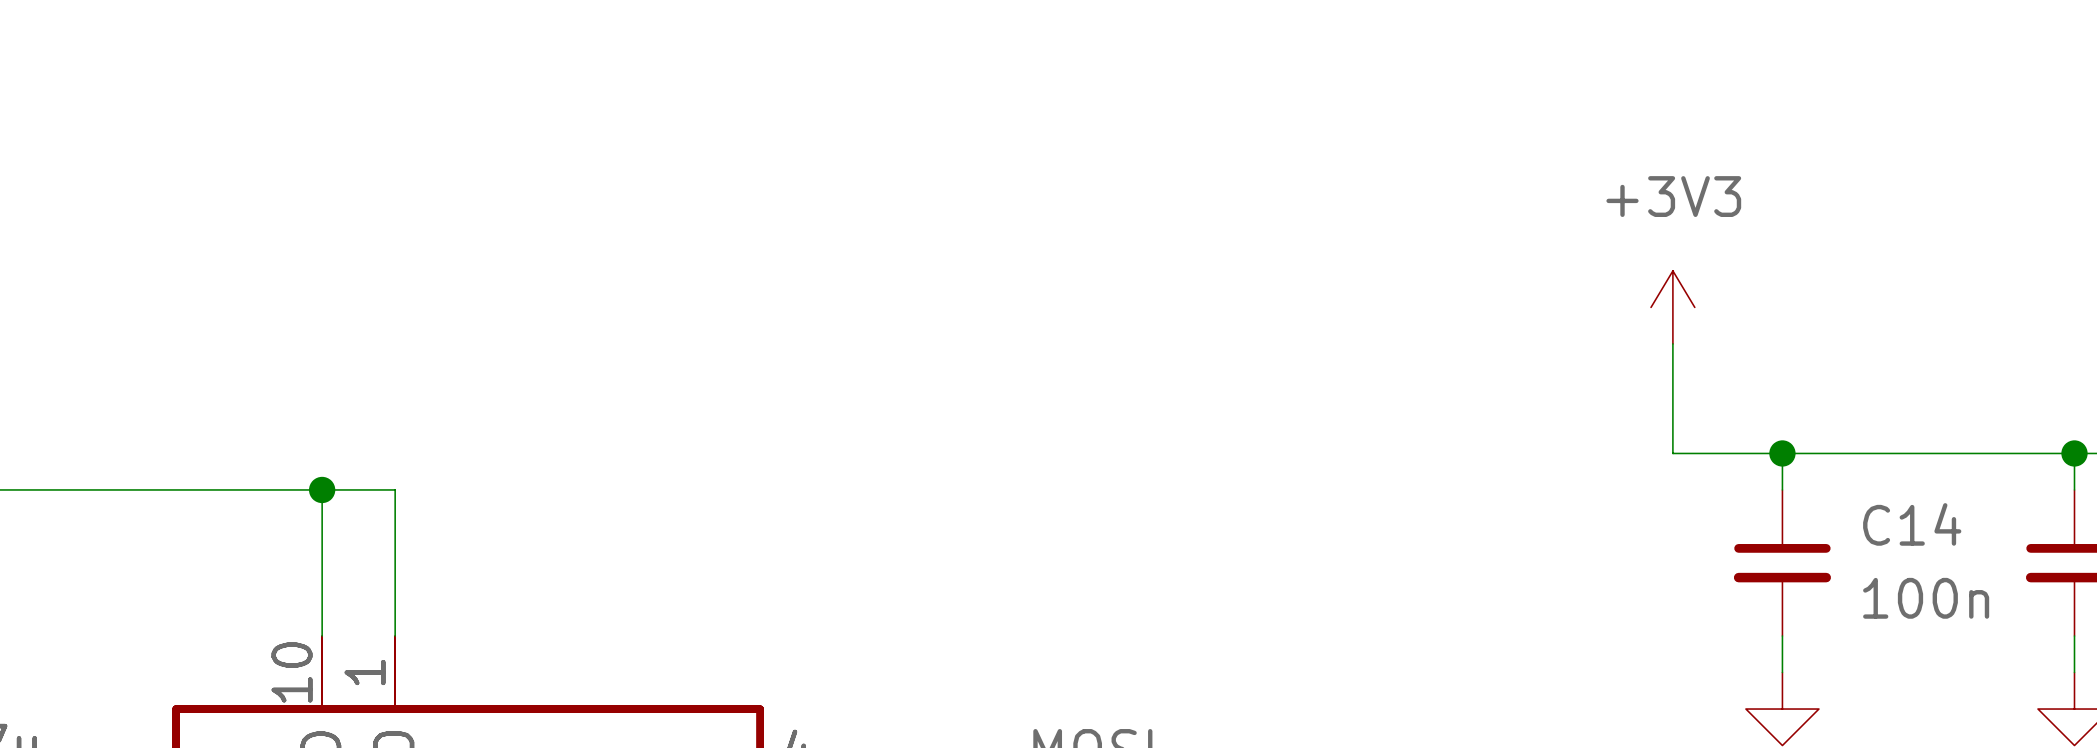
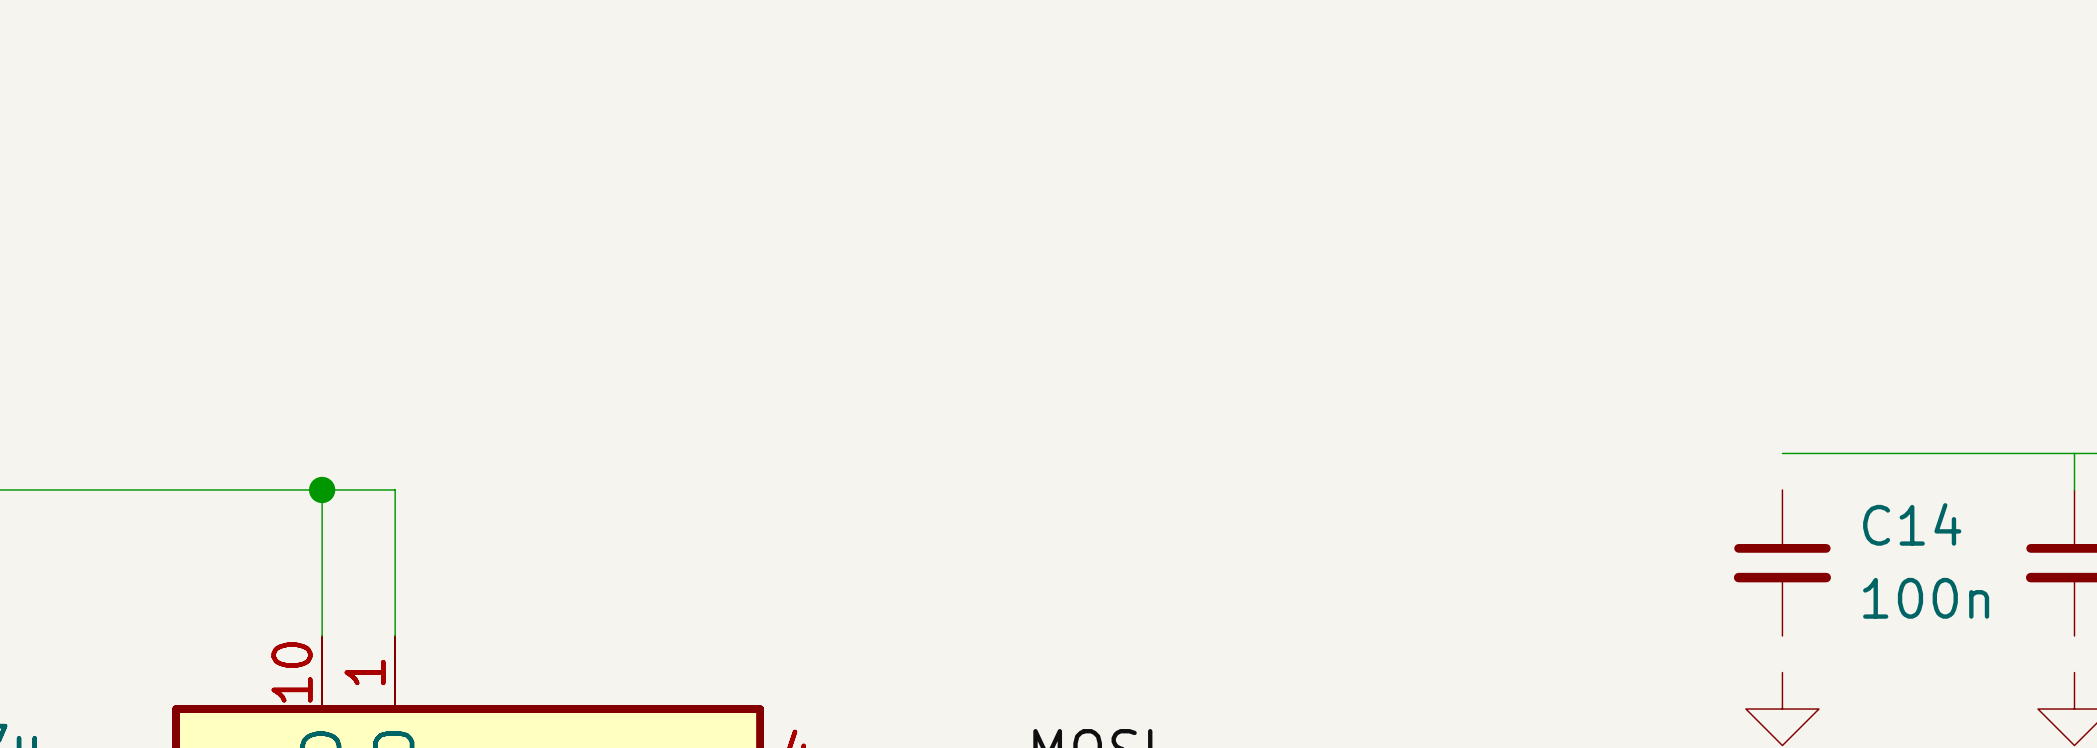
power symbol: +3V3 (1672, 307) -> none
wire: (1672, 343) (1672, 453) (1782, 453) (1782, 489) -> none
junction: (1782, 453) -> none
junction: (2074, 453) -> none
wire: (1782, 636) (1782, 672) -> none
wire: (2074, 636) (2074, 672) -> none

